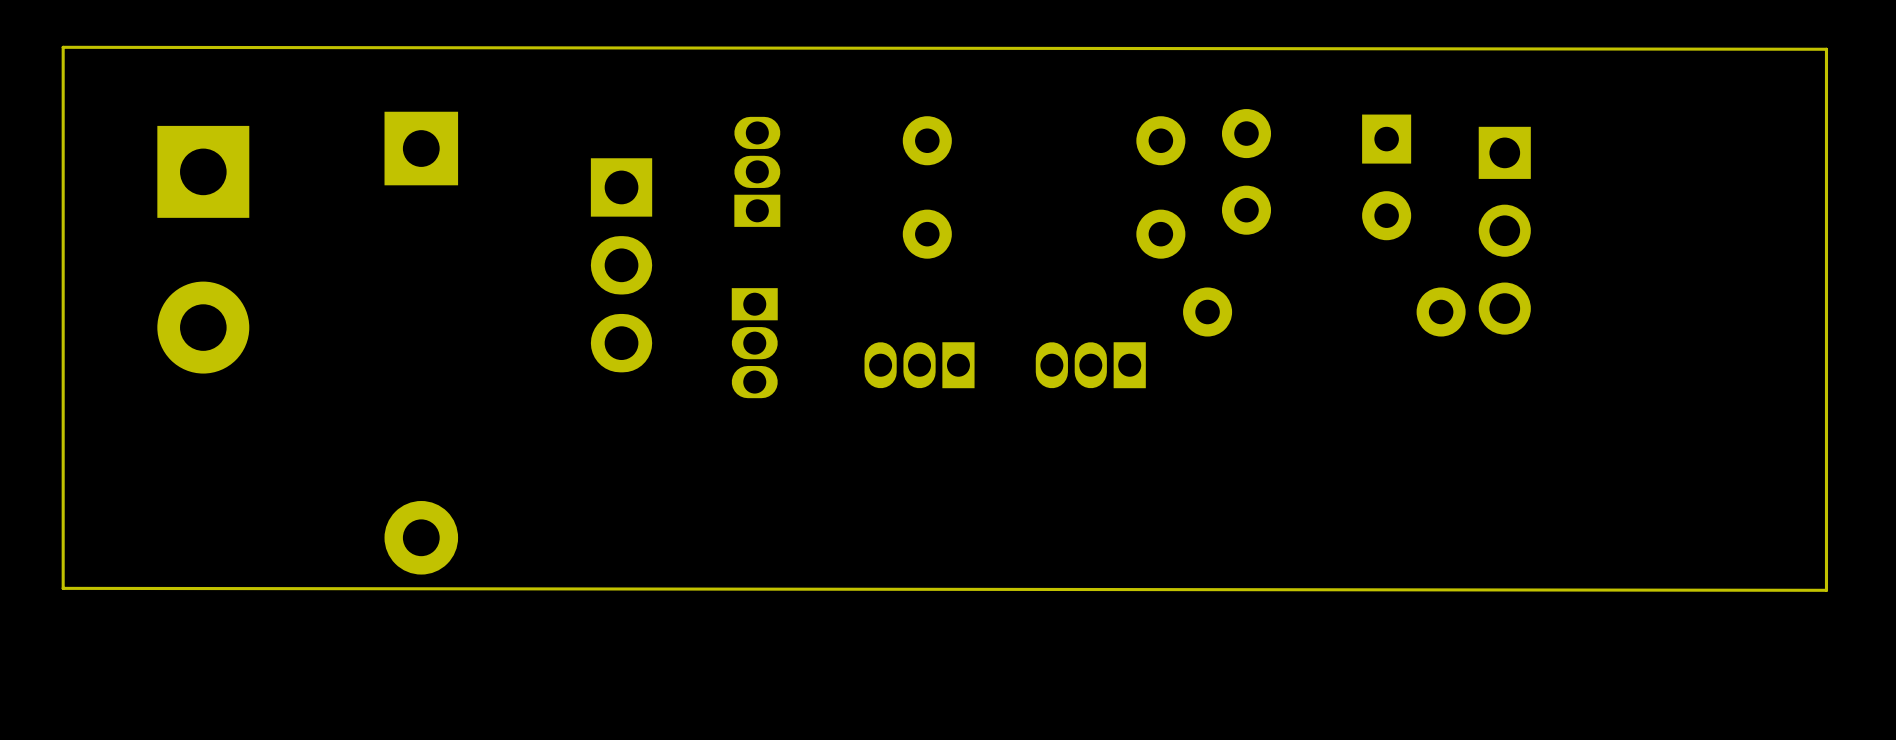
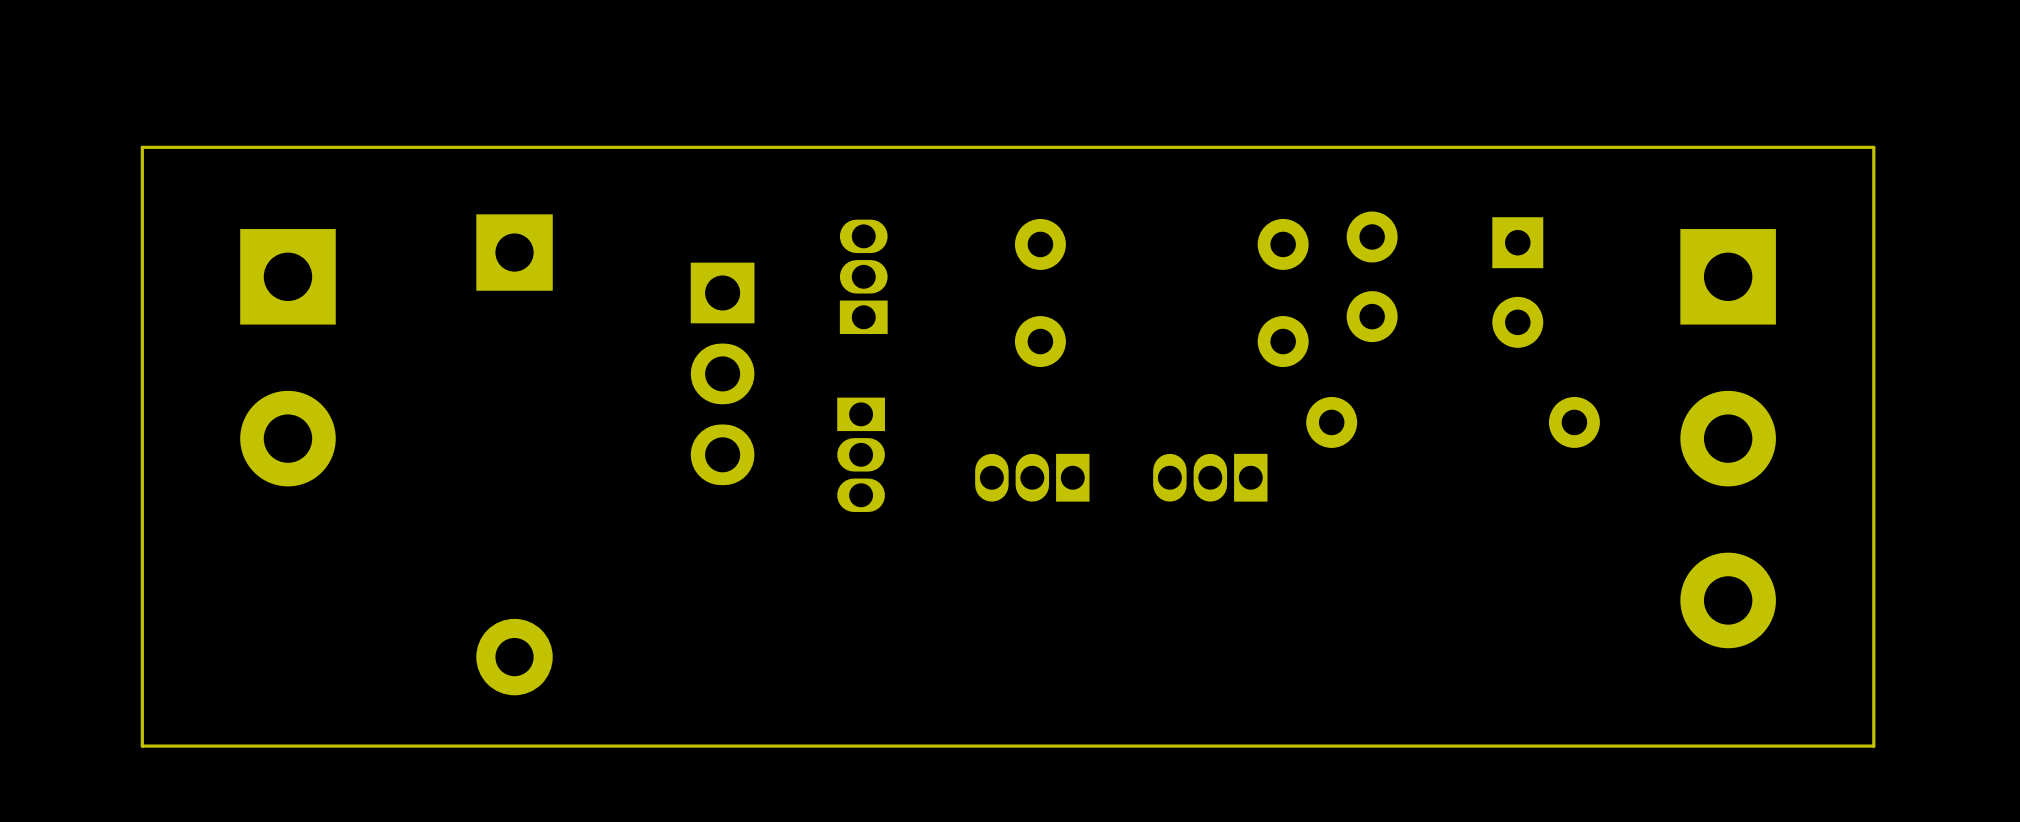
board edge: (63, 47) (1826, 49) (1826, 590) (63, 588) -> (142, 147) (1873, 147) (1873, 746) (142, 746) (142, 709)
part: (1504, 230) -> none
part: none -> (1728, 438)

